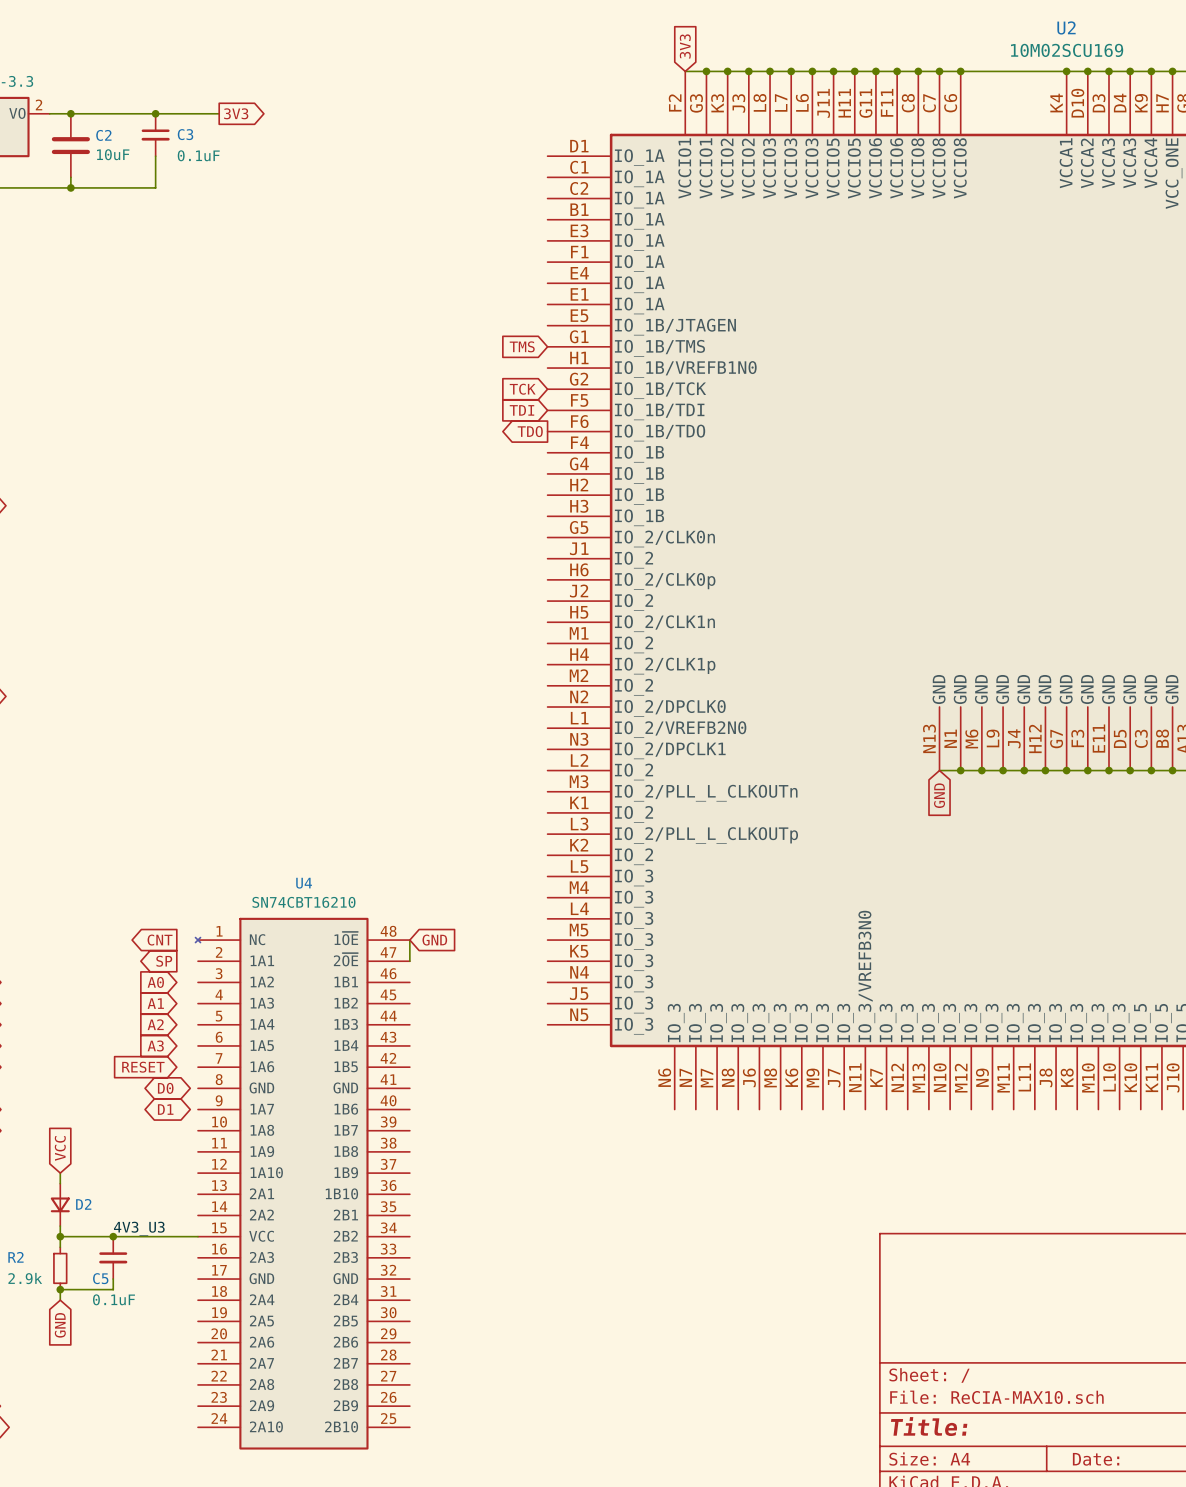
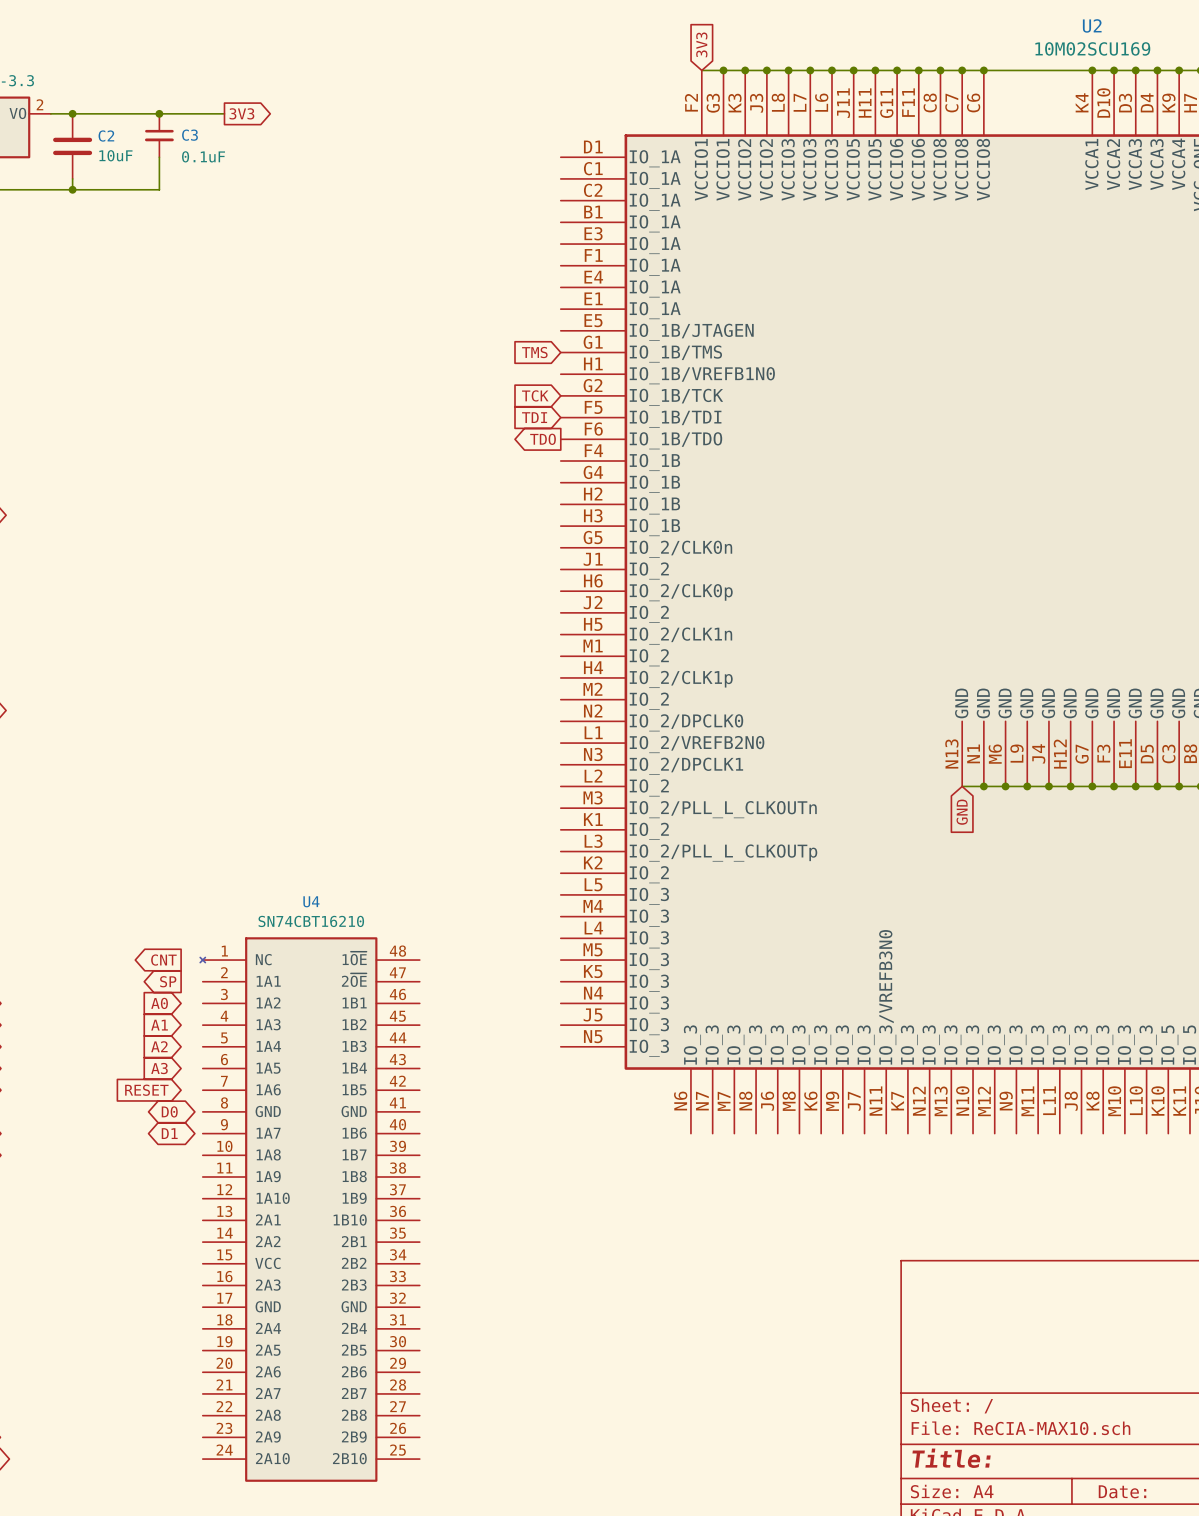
wire: (409, 940) (409, 961) -> none
global label: GND (434, 940) -> none
global label: VCC (60, 1148) -> none
wire: (60, 1173) (60, 1183) -> none
D2: (60, 1204) -> none
wire: (60, 1226) (60, 1247) -> none
label: 4V3_U3 (139, 1228) -> none
wire: (60, 1236) (198, 1236) -> none
junction: (60, 1236) -> none
junction: (113, 1236) -> none
C5: 0.1uF (113, 1257) -> none
R2: 2.9k (60, 1268) -> none
wire: (113, 1279) (113, 1289) (60, 1289) (60, 1300) -> none
junction: (60, 1289) -> none
global label: GND (60, 1325) -> none

